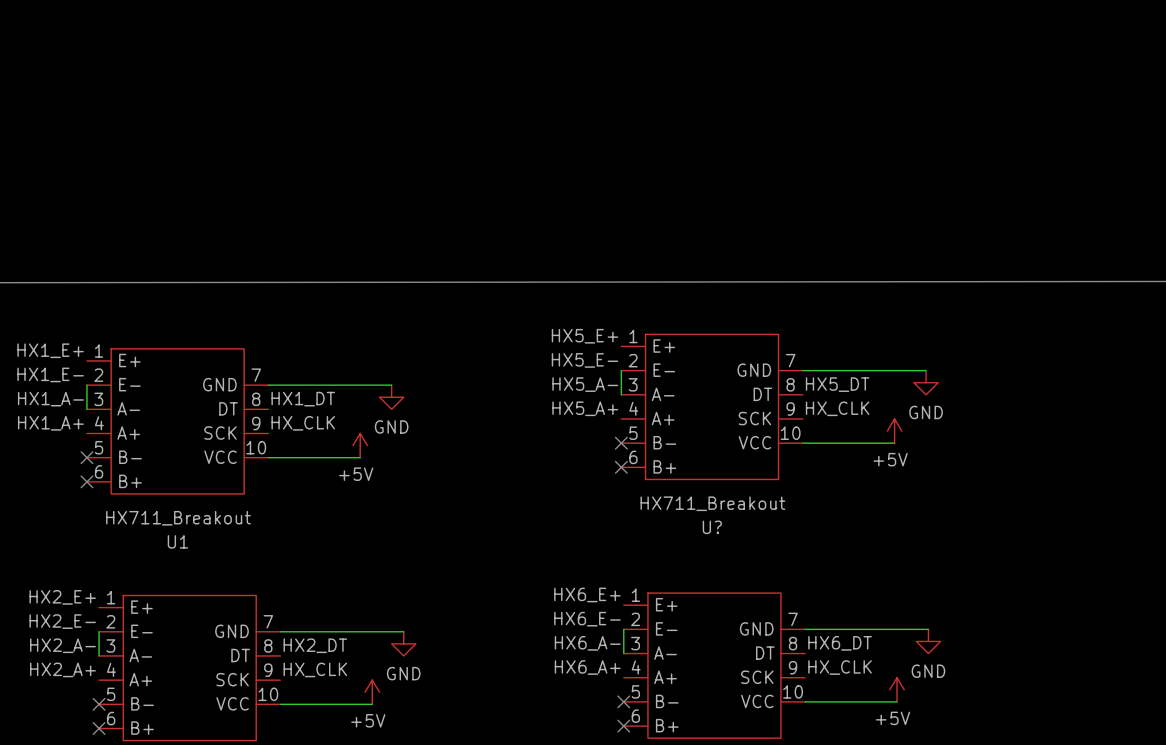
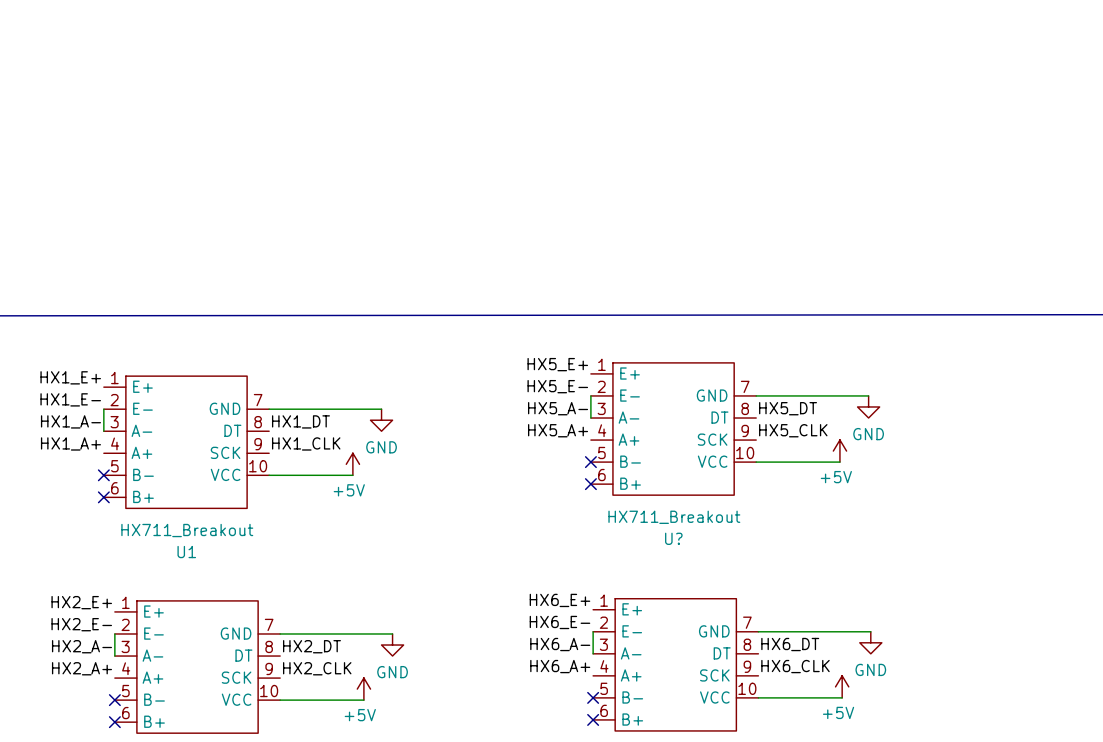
label: HX_CLK (837, 408) -> HX5_CLK (793, 430)
label: HX_CLK (303, 423) -> HX1_CLK (306, 443)
label: HX_CLK (840, 667) -> HX6_CLK (795, 666)
label: HX_CLK (315, 669) -> HX2_CLK (317, 668)

